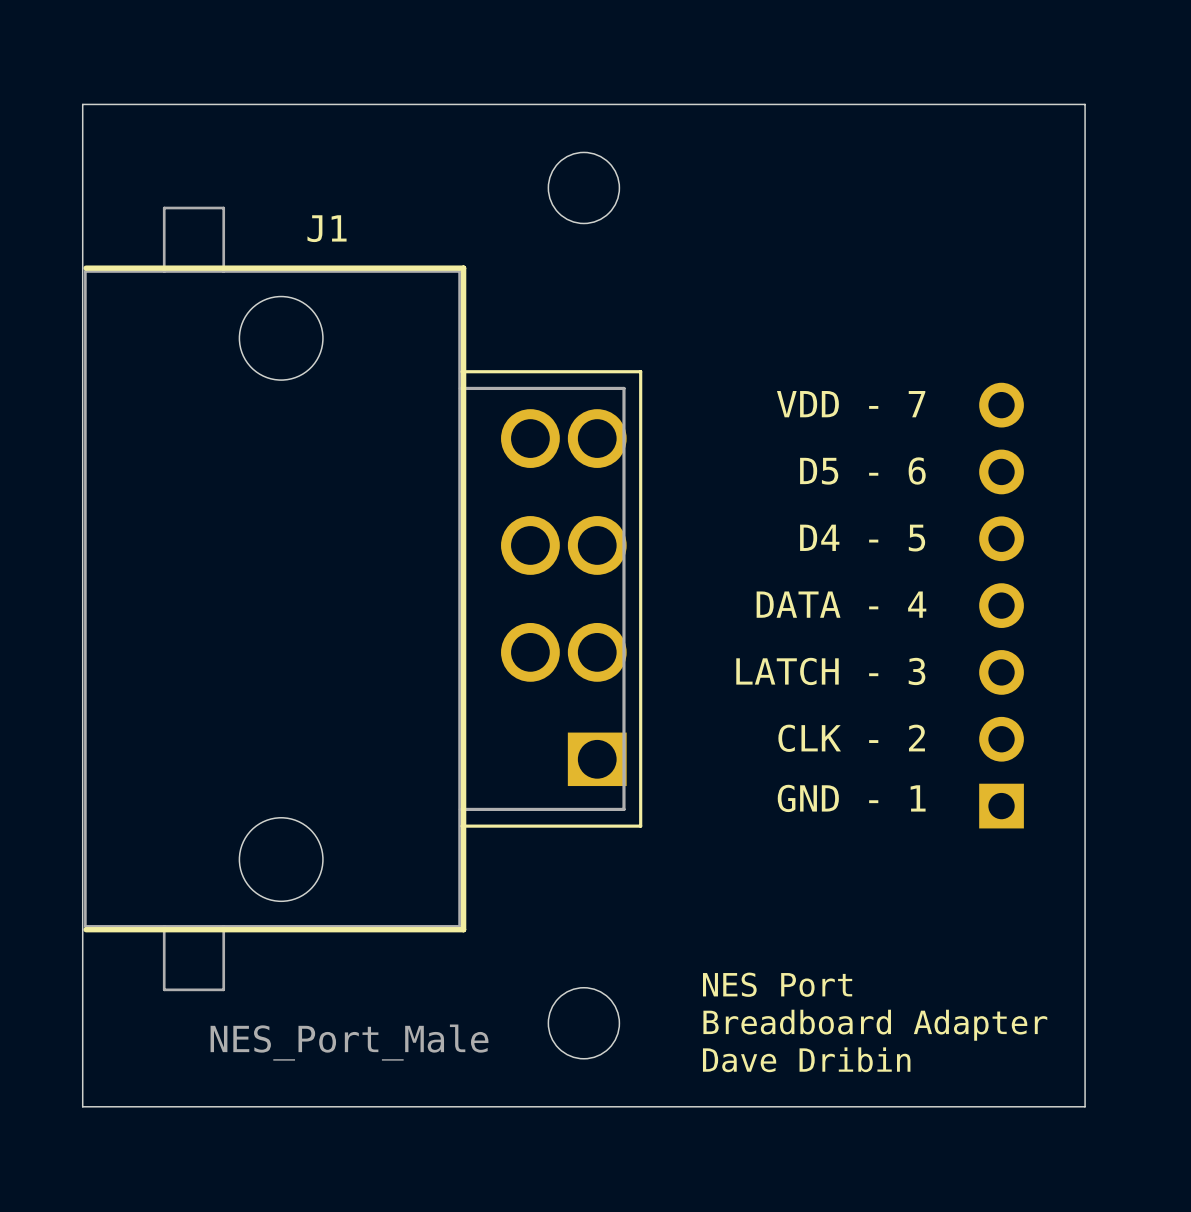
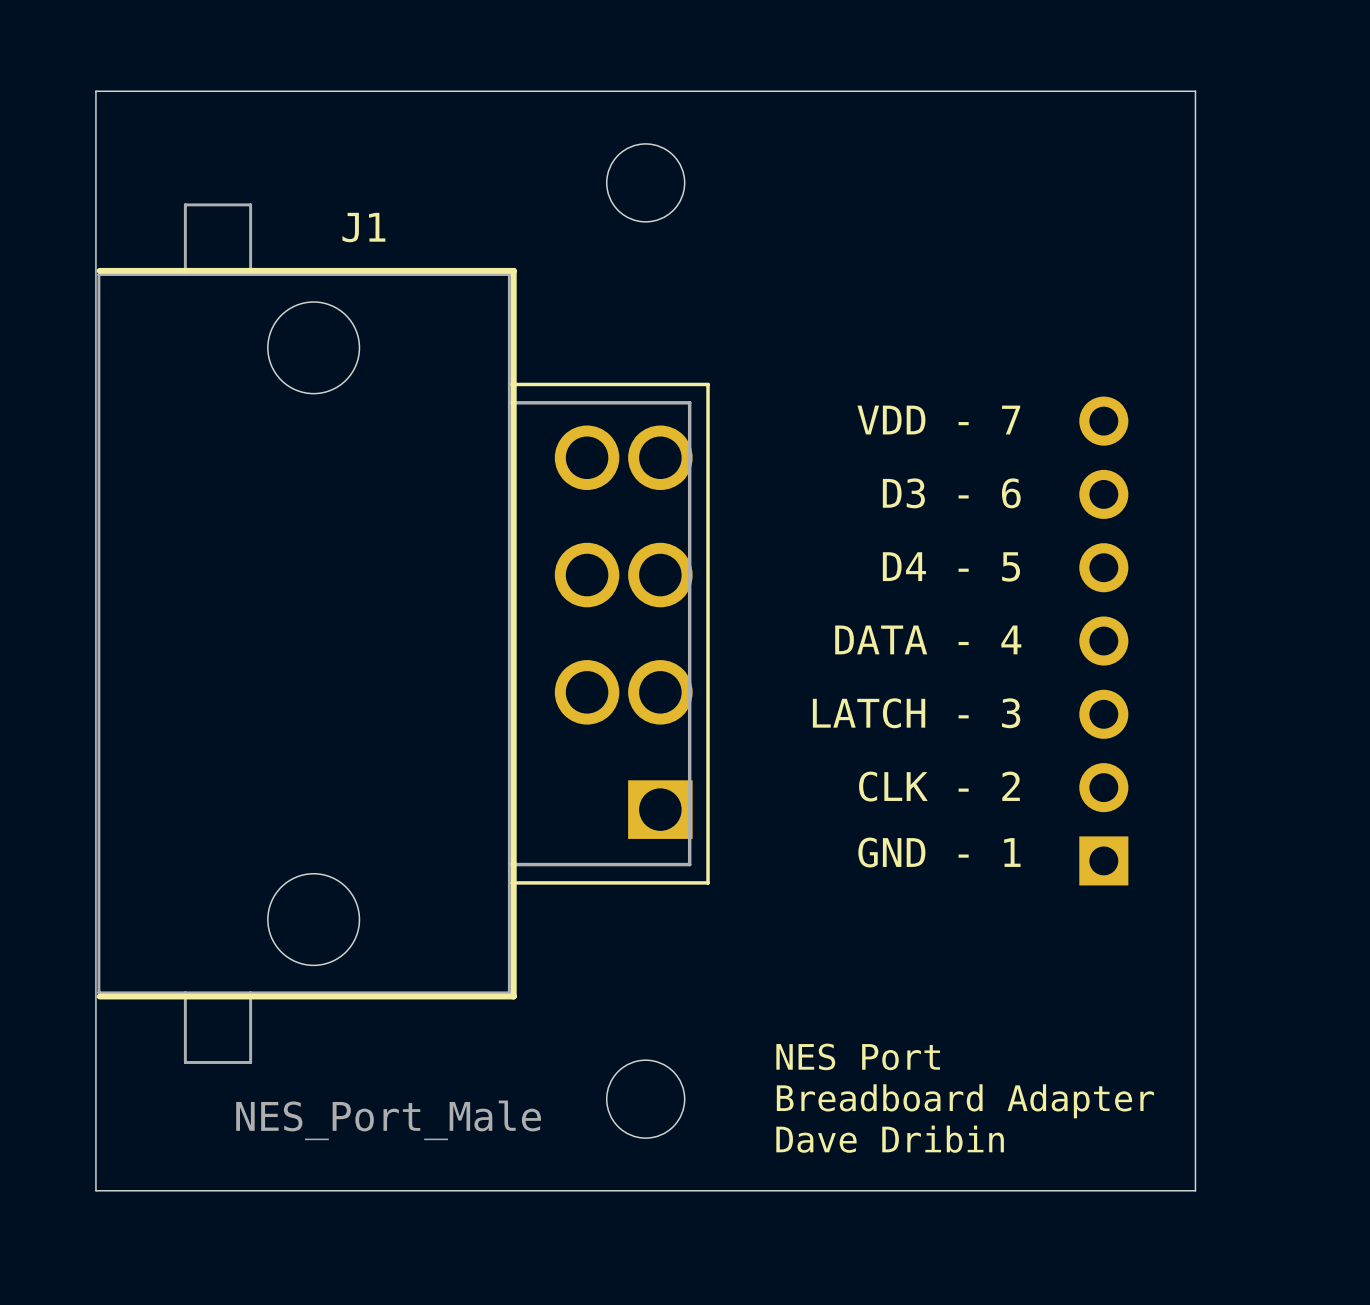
text: D5 - 6 (862, 471) -> D3 - 6 (951, 493)

